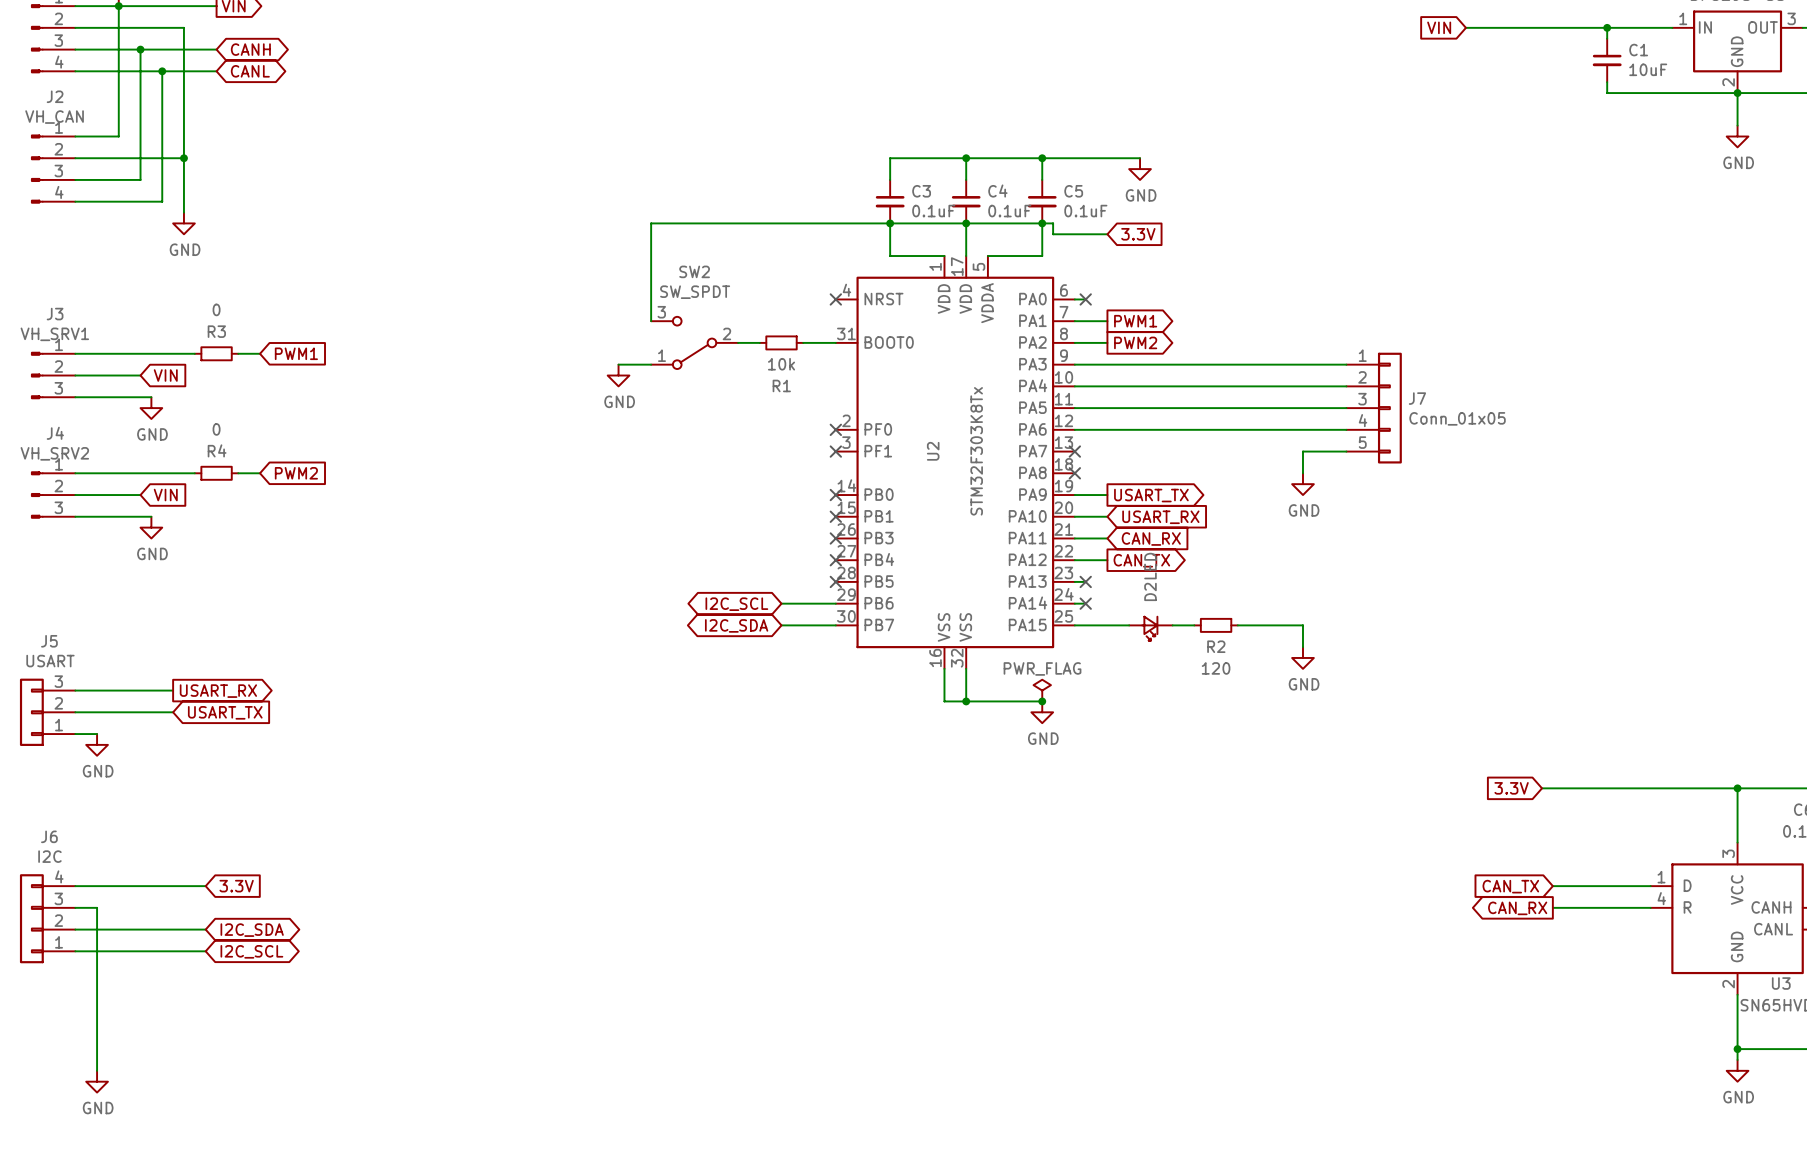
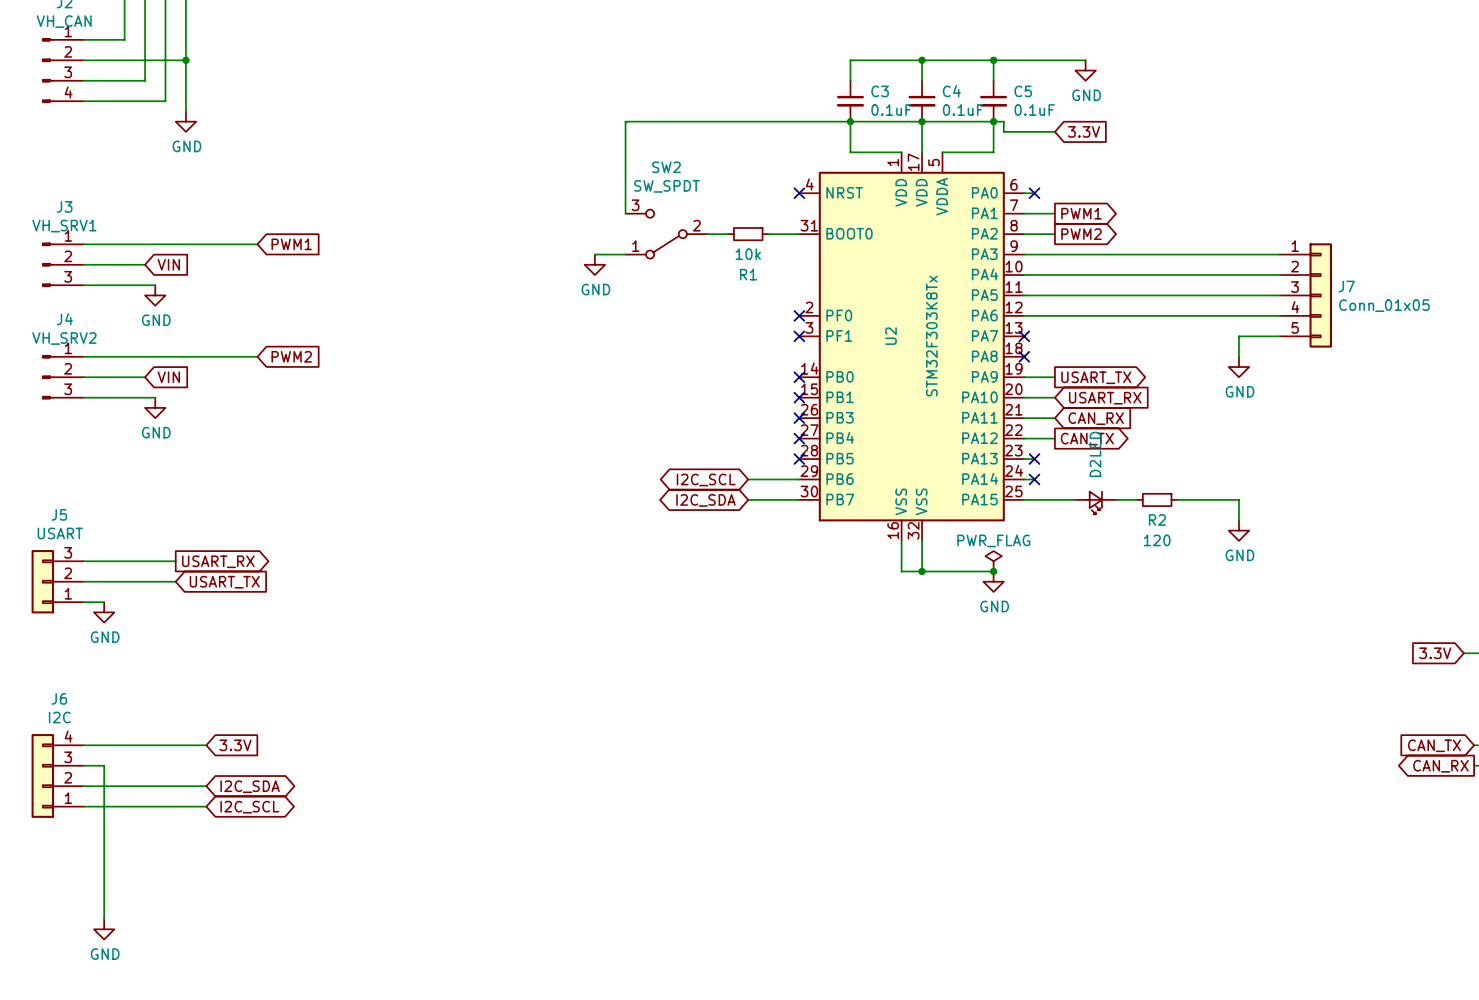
wire: none -> (196, 244) (237, 244)
R3: 0 (216, 353) -> none
wire: none -> (196, 356) (237, 356)
R4: 0 (216, 473) -> none

